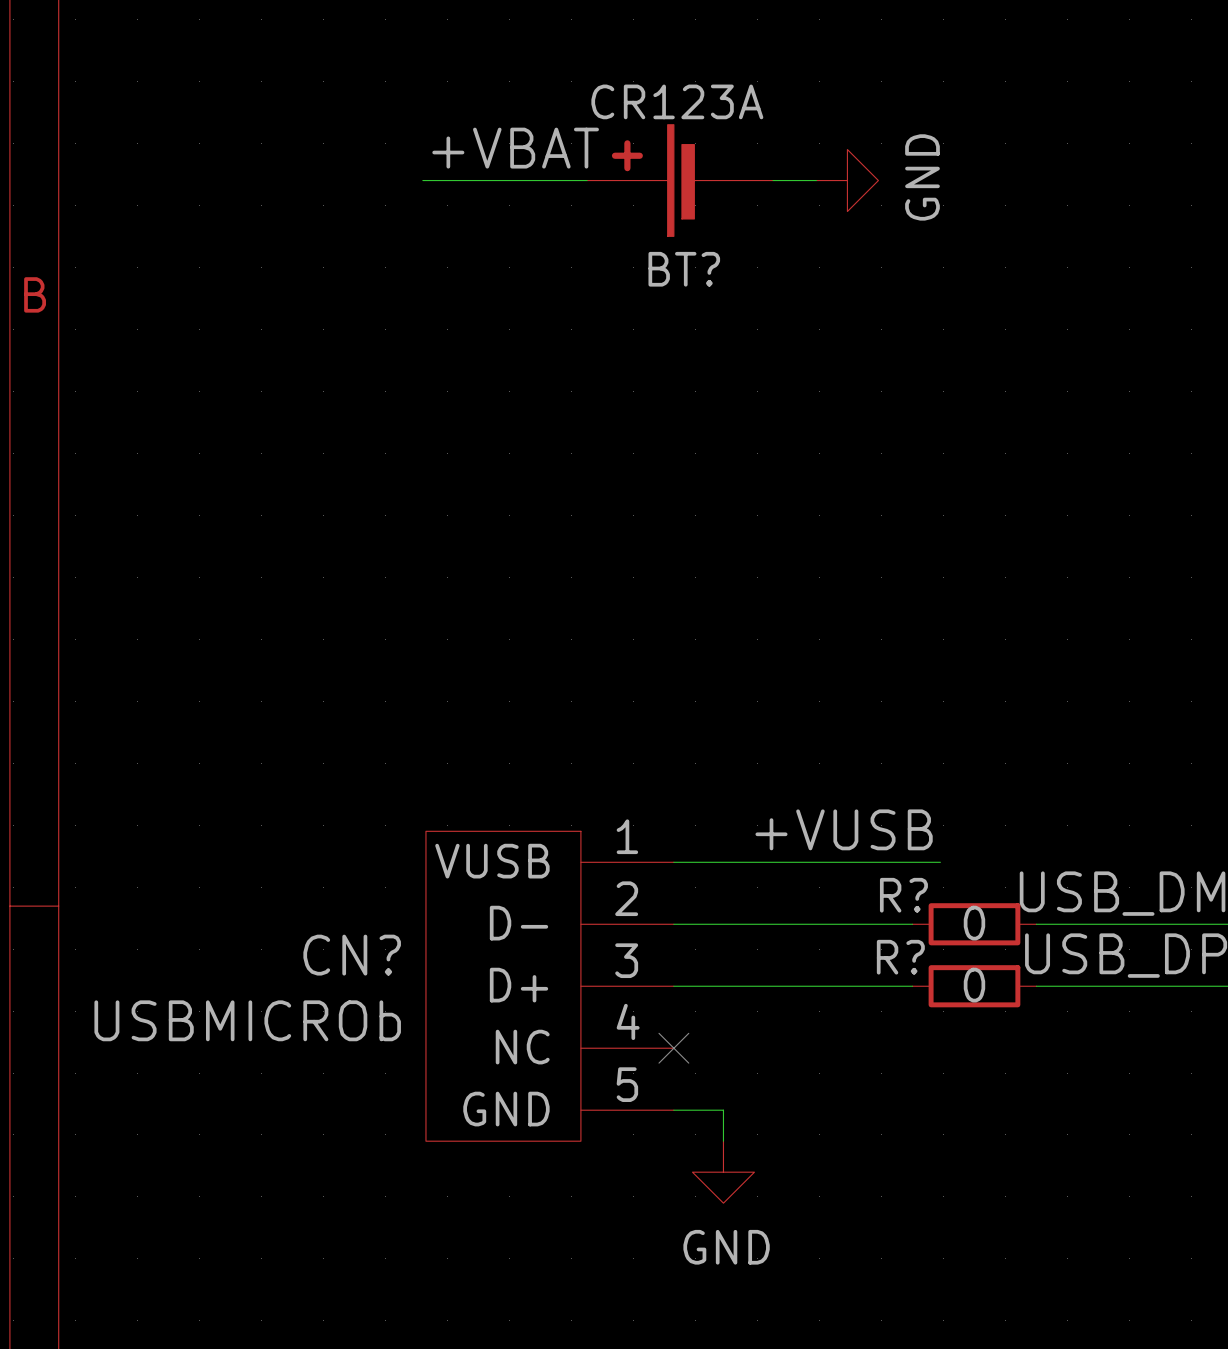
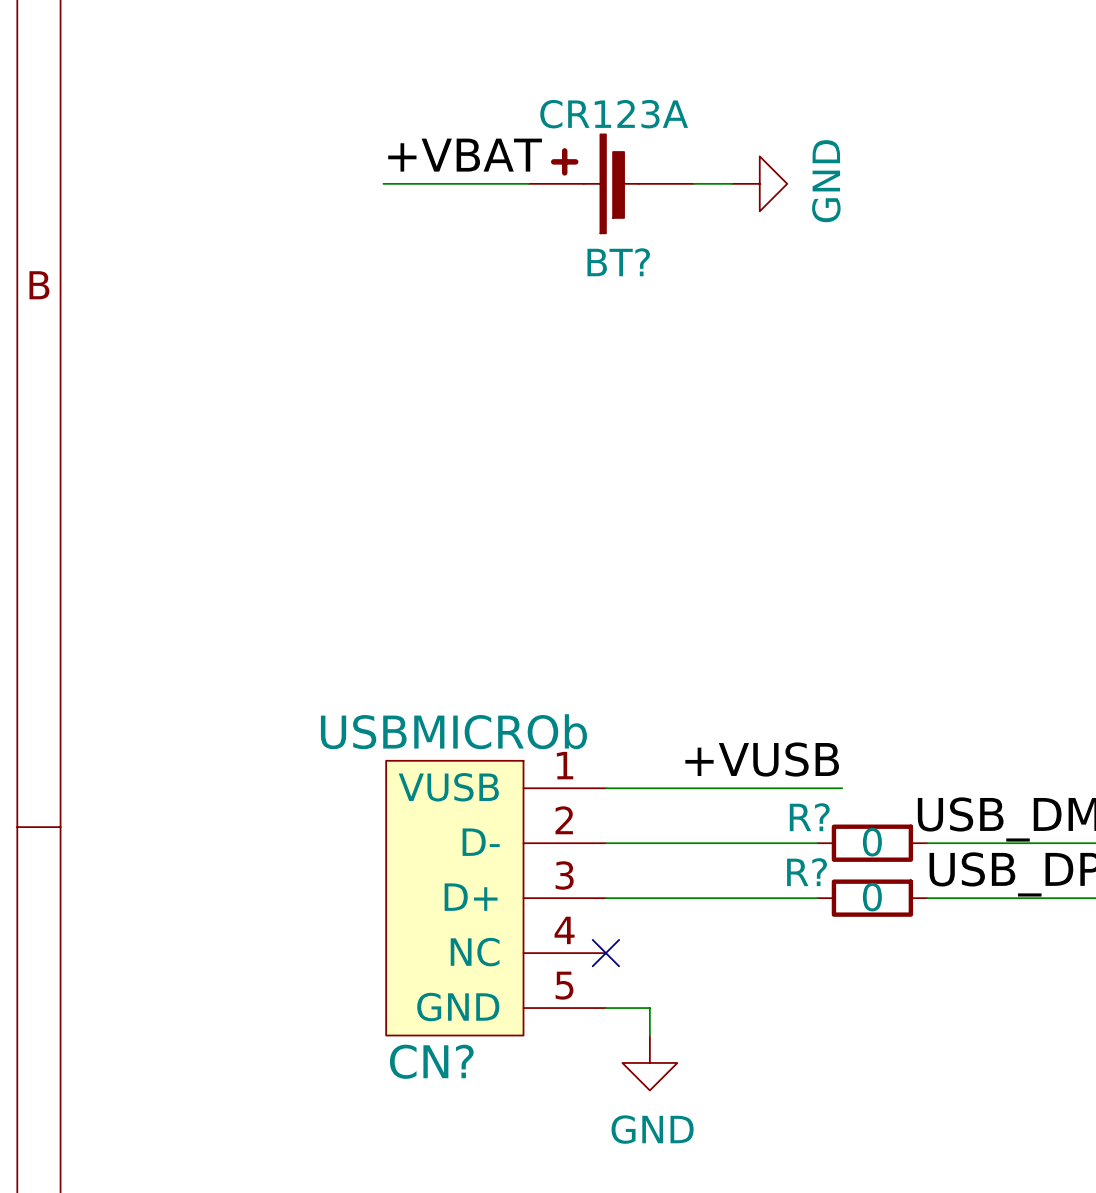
CN? name position: CN? (352, 955) -> CN? (431, 1061)
CN? value position: USBMICROb (247, 1020) -> USBMICROb (453, 731)

